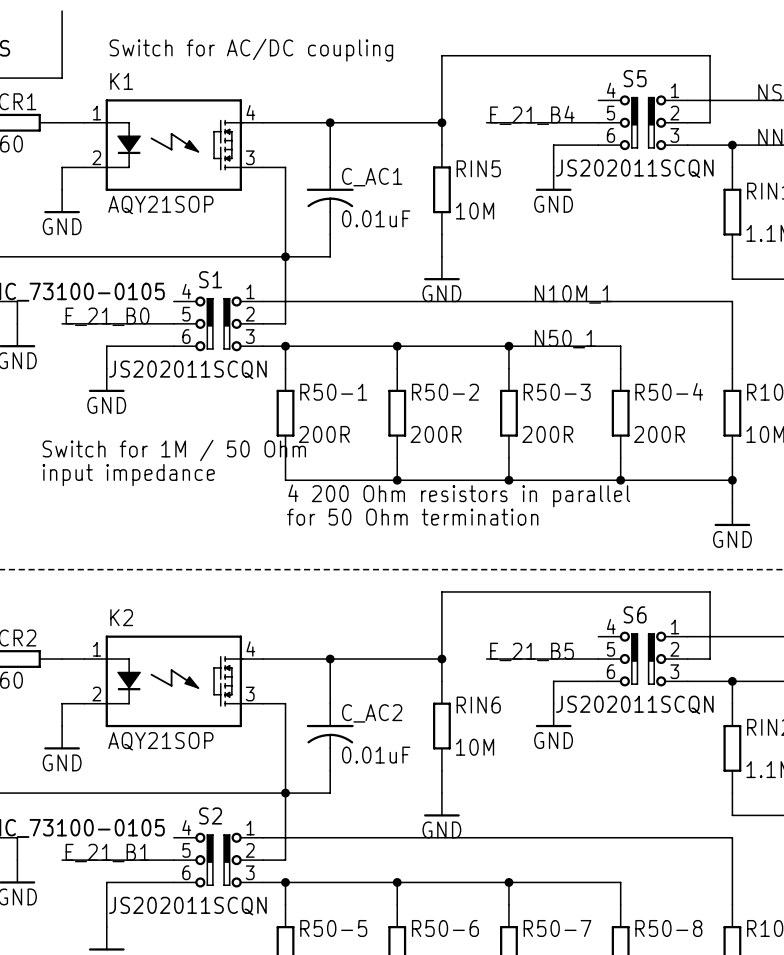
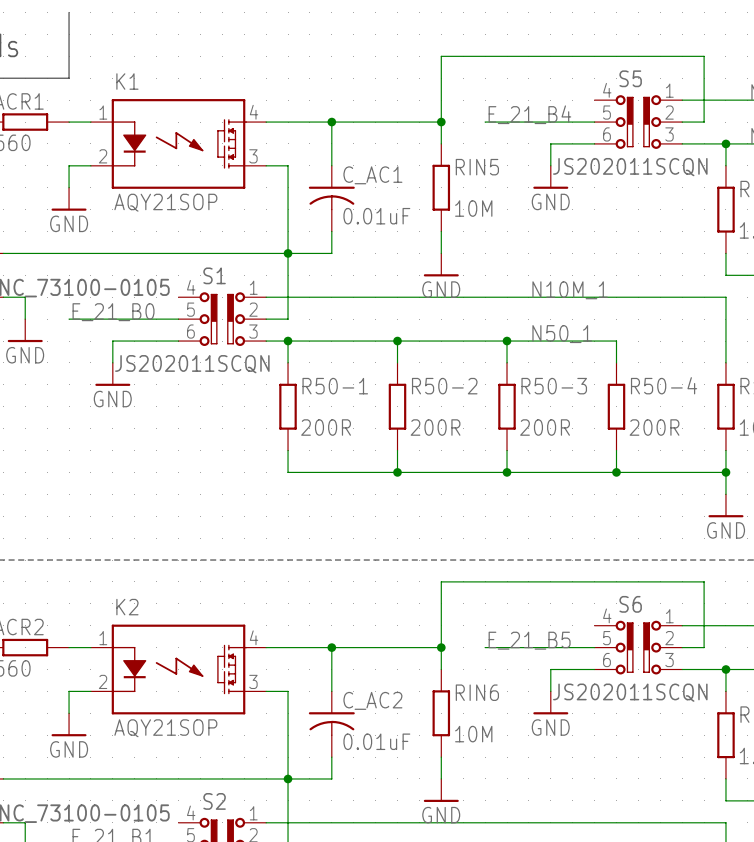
text: Switch for AC/DC coupling (251, 50) -> none
text: Switch for 1M / 50 Ohm (174, 450) -> none
text: input impedance (128, 475) -> none
text: 4 200 Ohm resistors in parallel (459, 495) -> none
text: for 50 Ohm termination (412, 517) -> none

